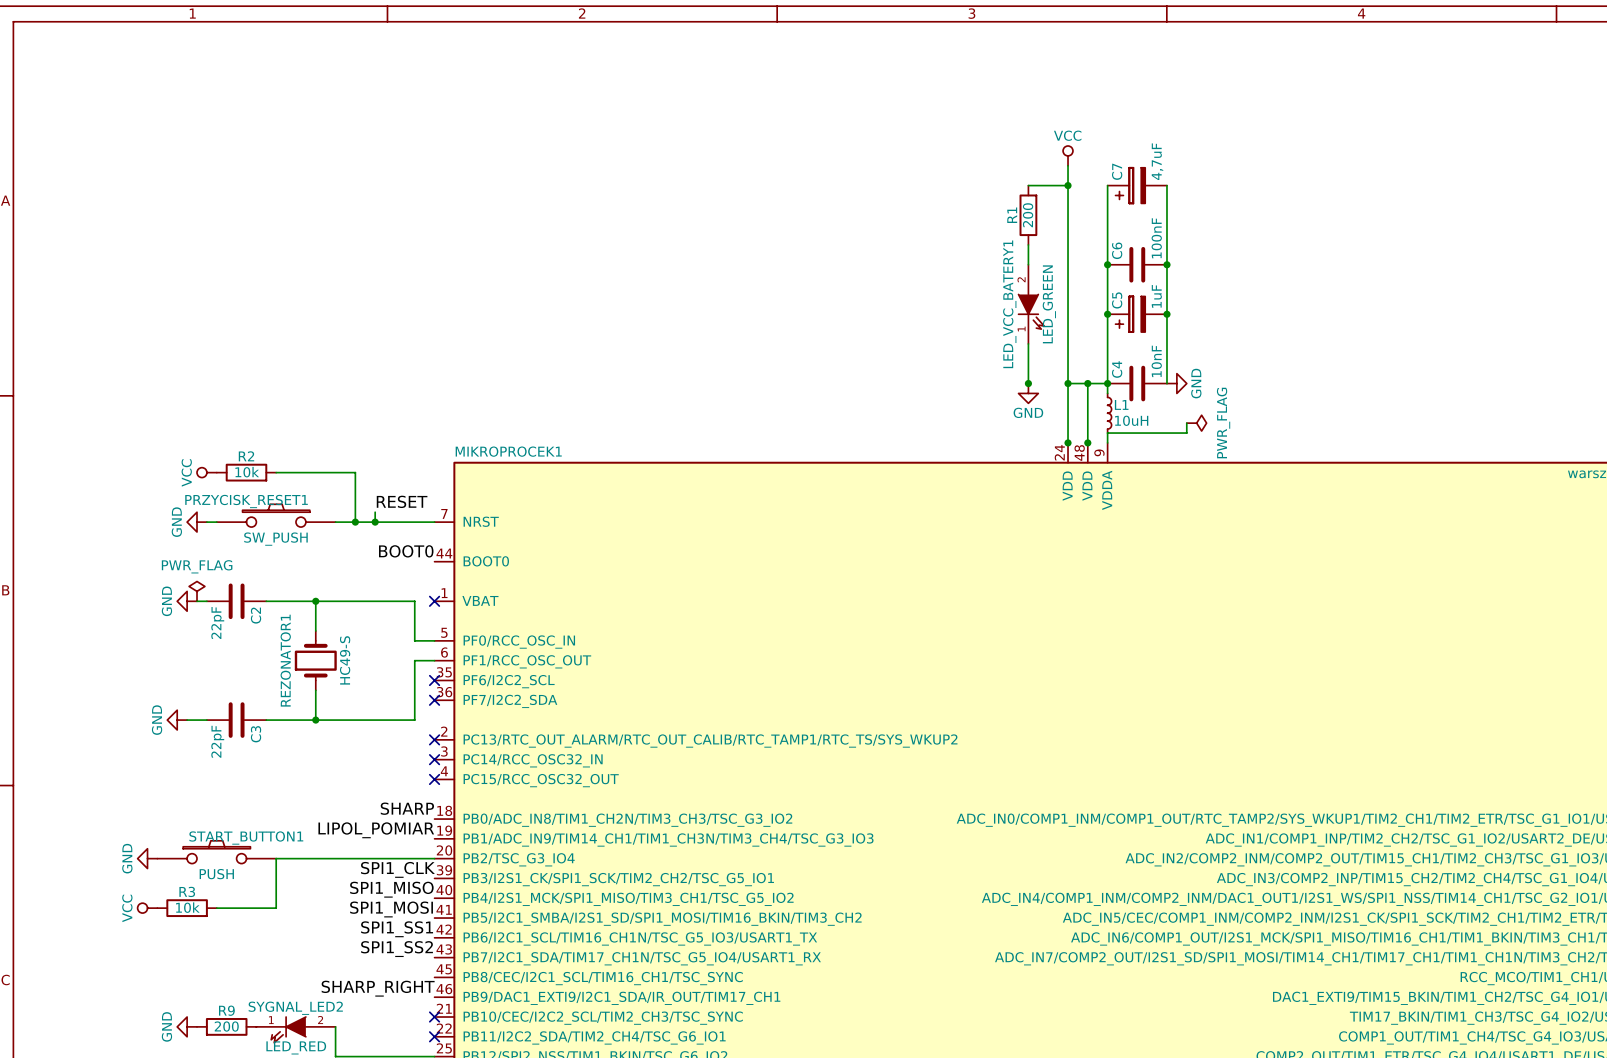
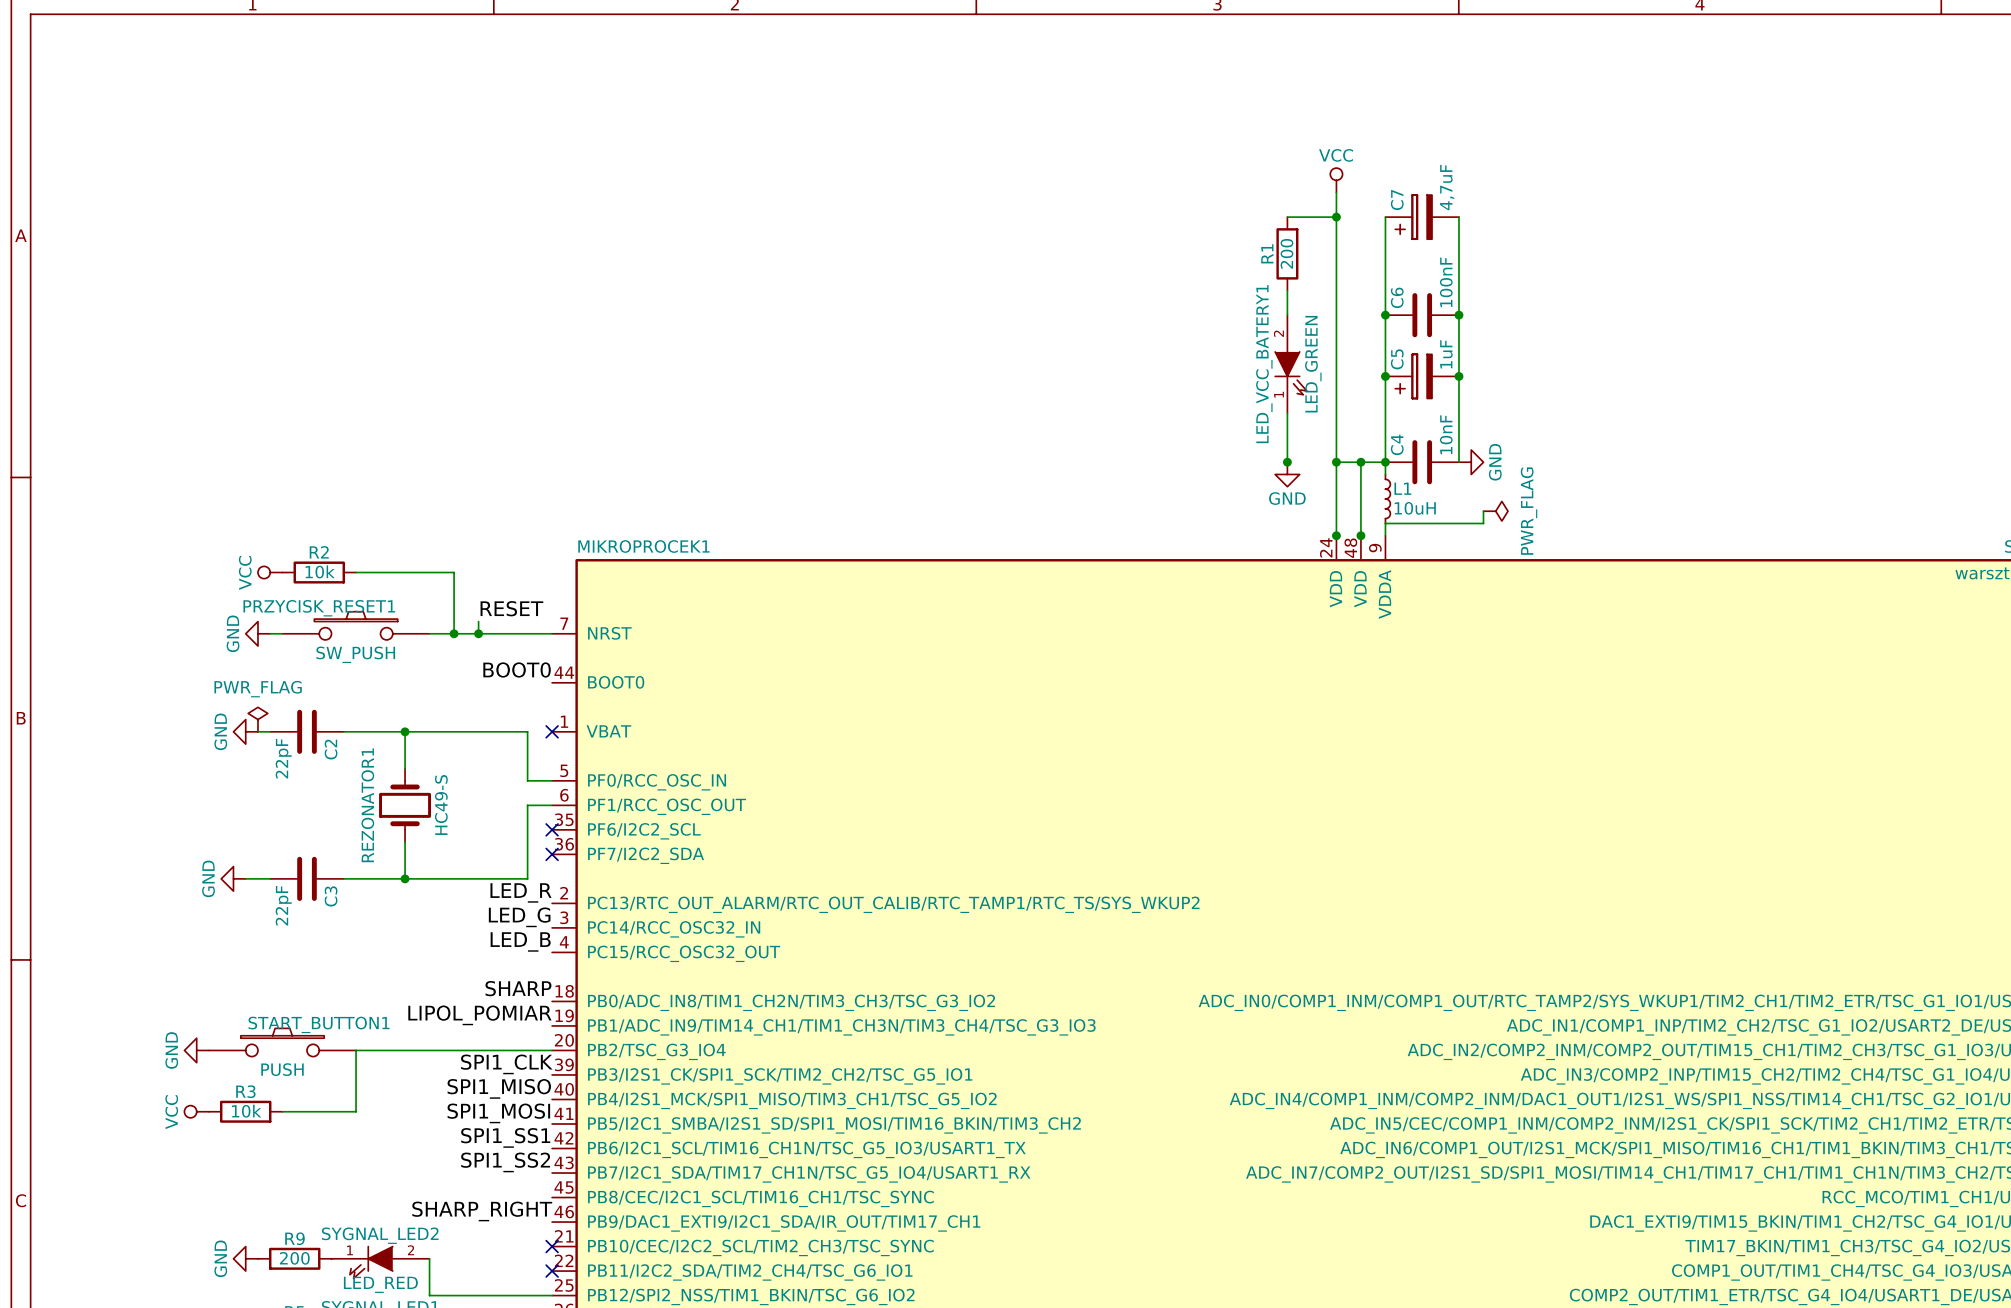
label: none -> LED_R (521, 892)
no-connect mark: (434, 739) -> none
label: none -> LED_G (519, 917)
no-connect mark: (434, 759) -> none
label: none -> LED_B (520, 941)
no-connect mark: (434, 779) -> none

